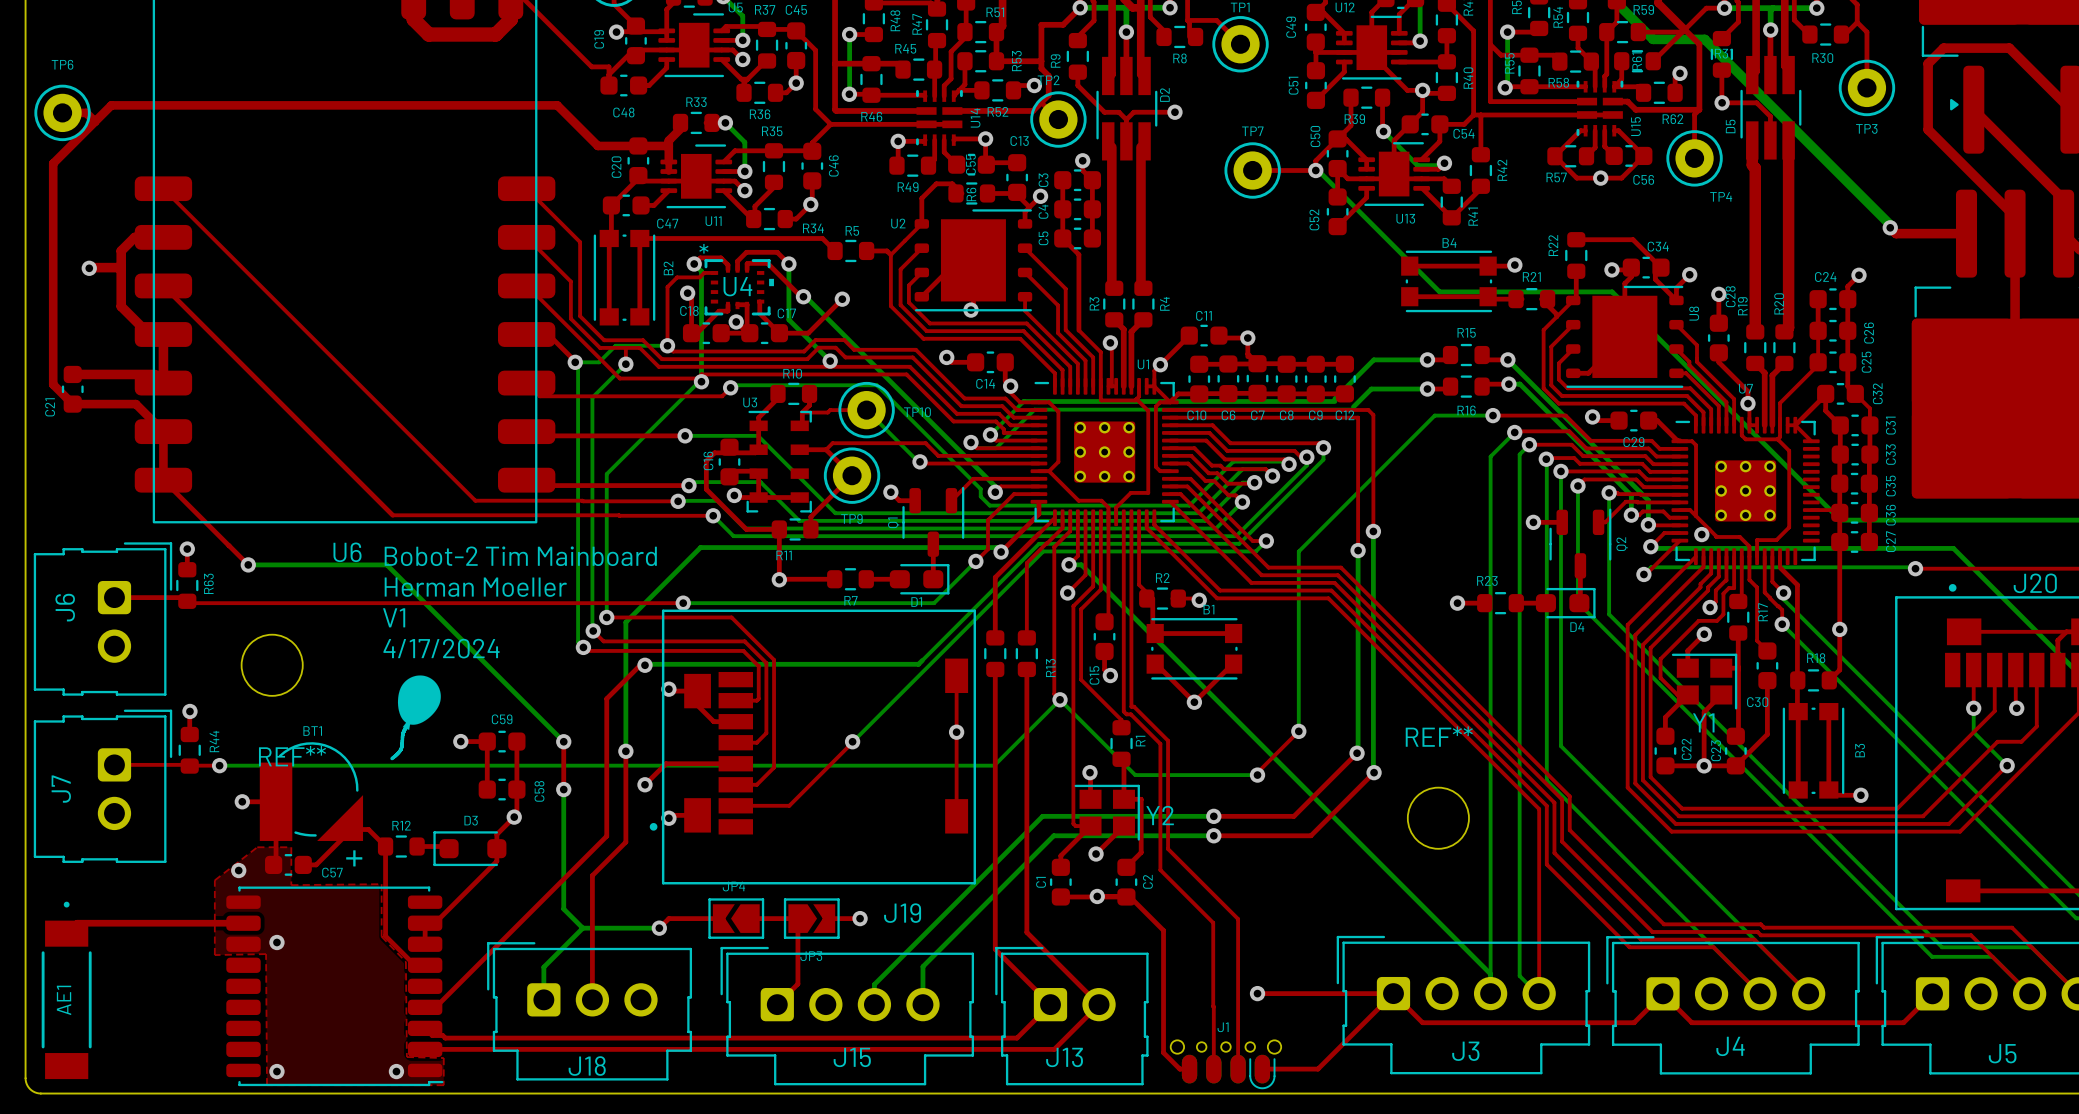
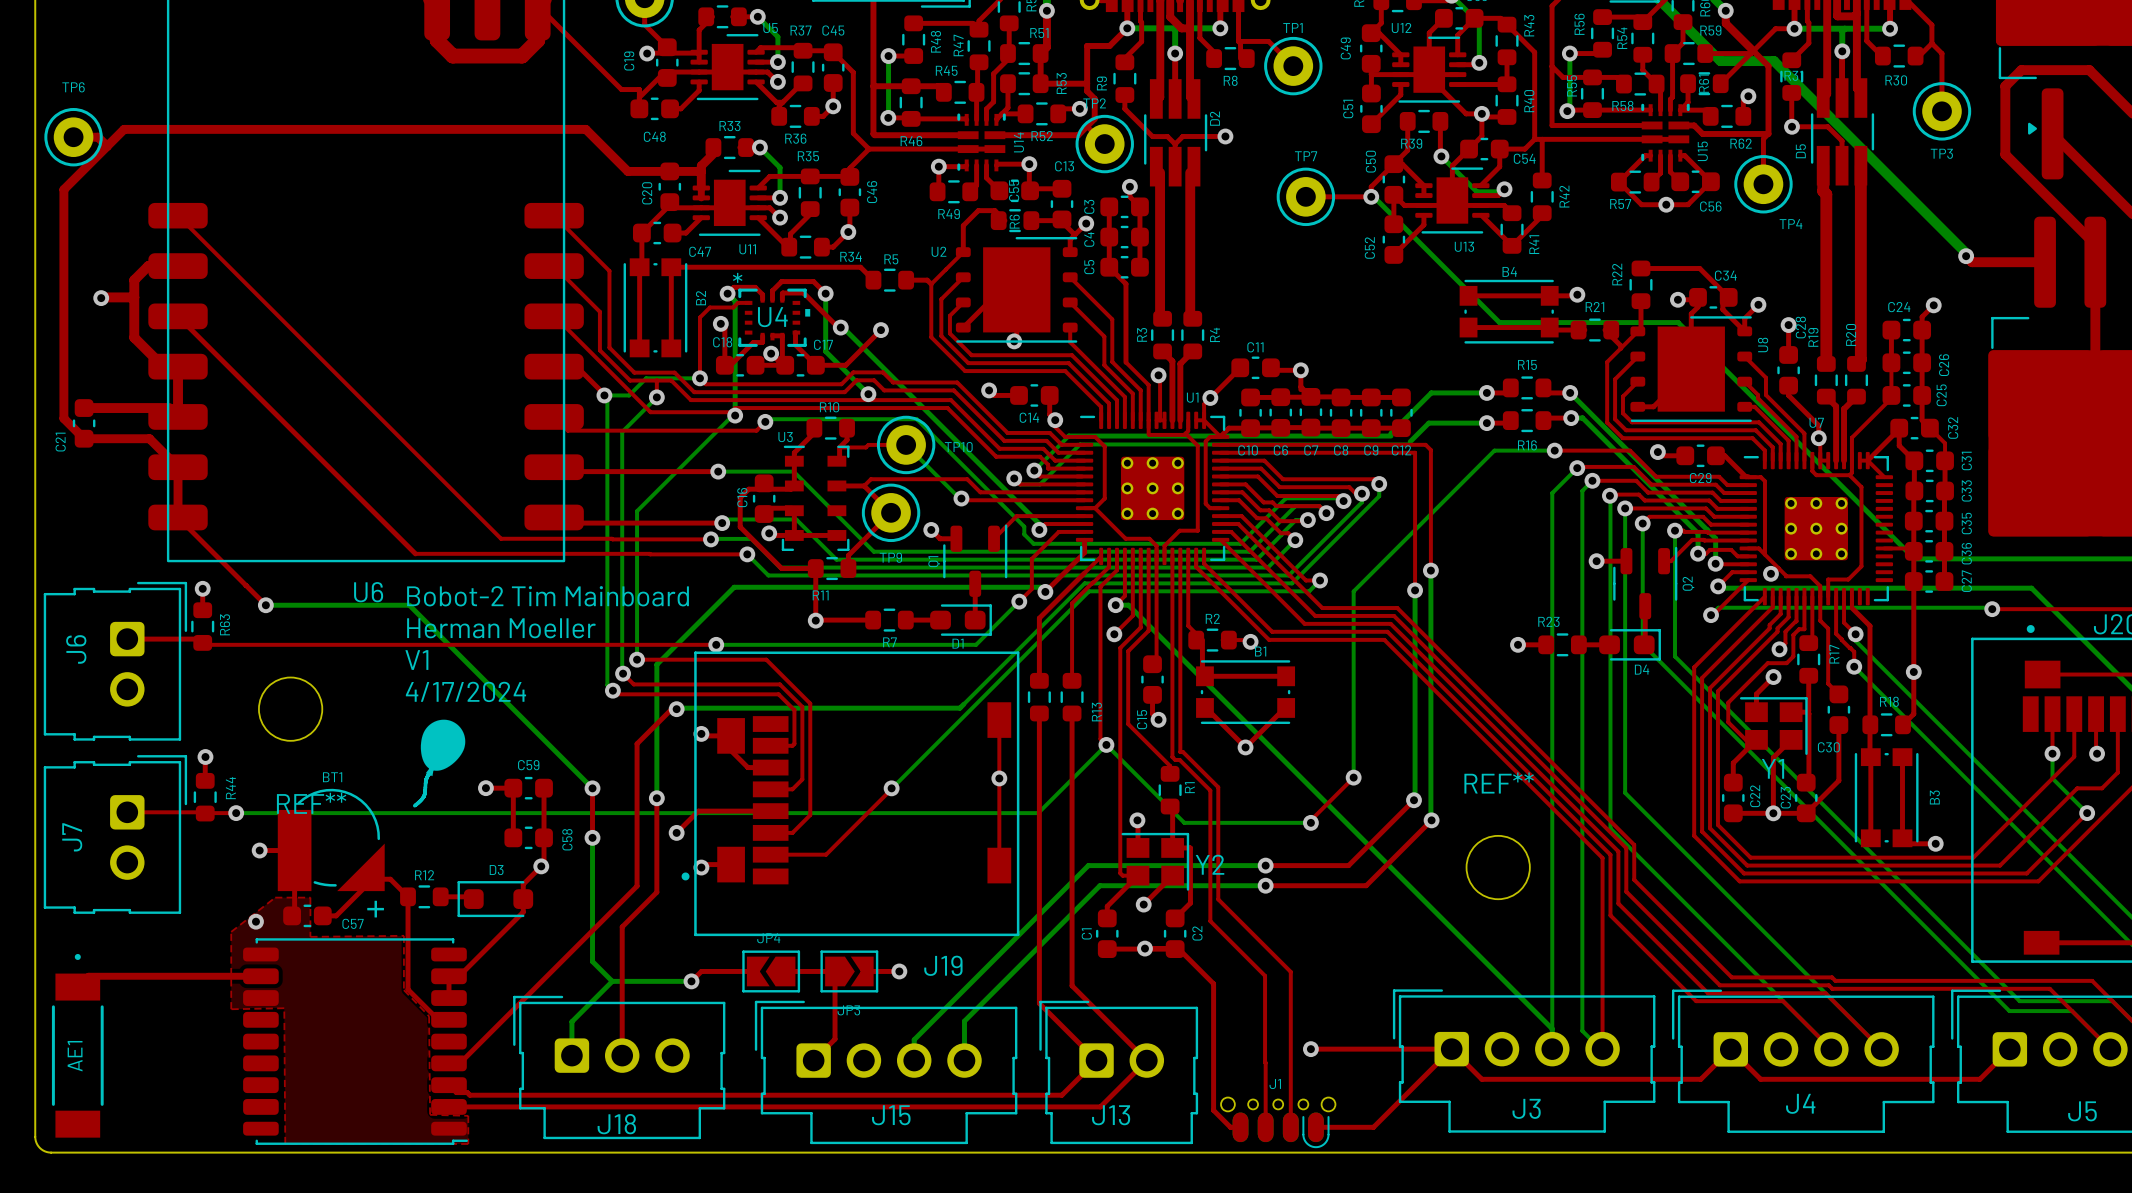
via: (276, 942) -> none
via: (276, 1071) -> none
via: (396, 1071) -> none

